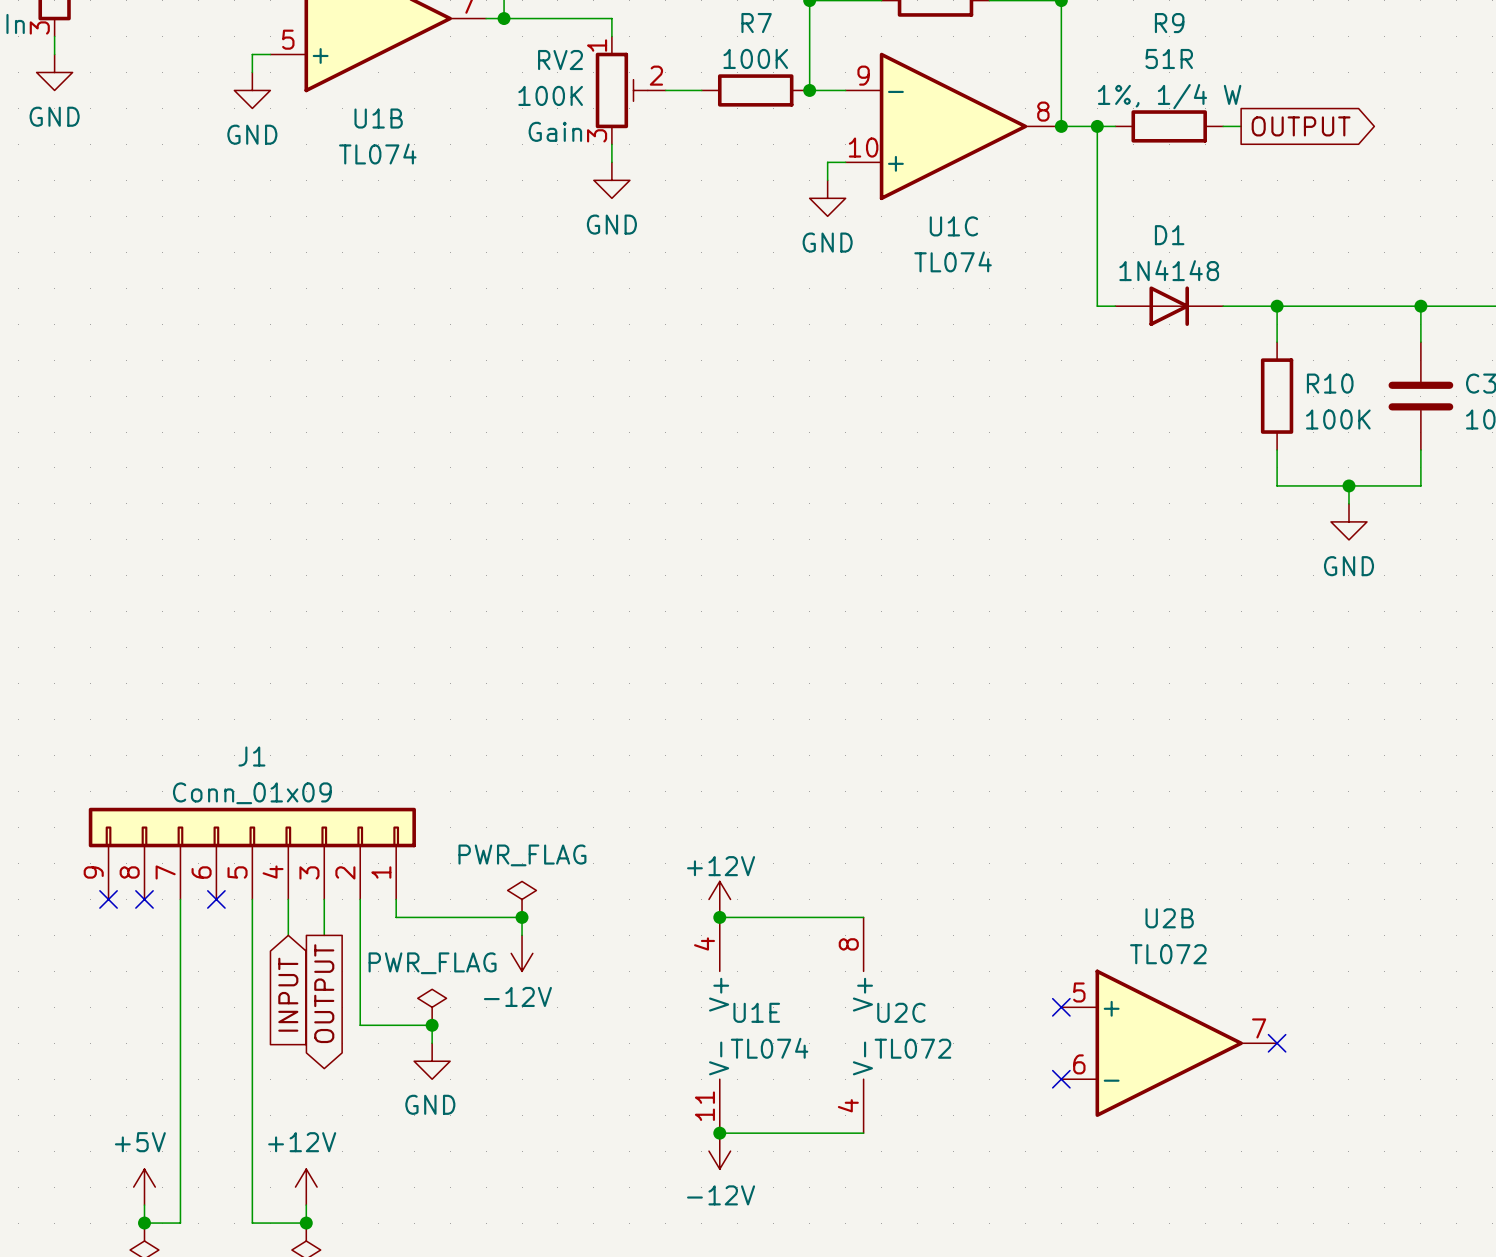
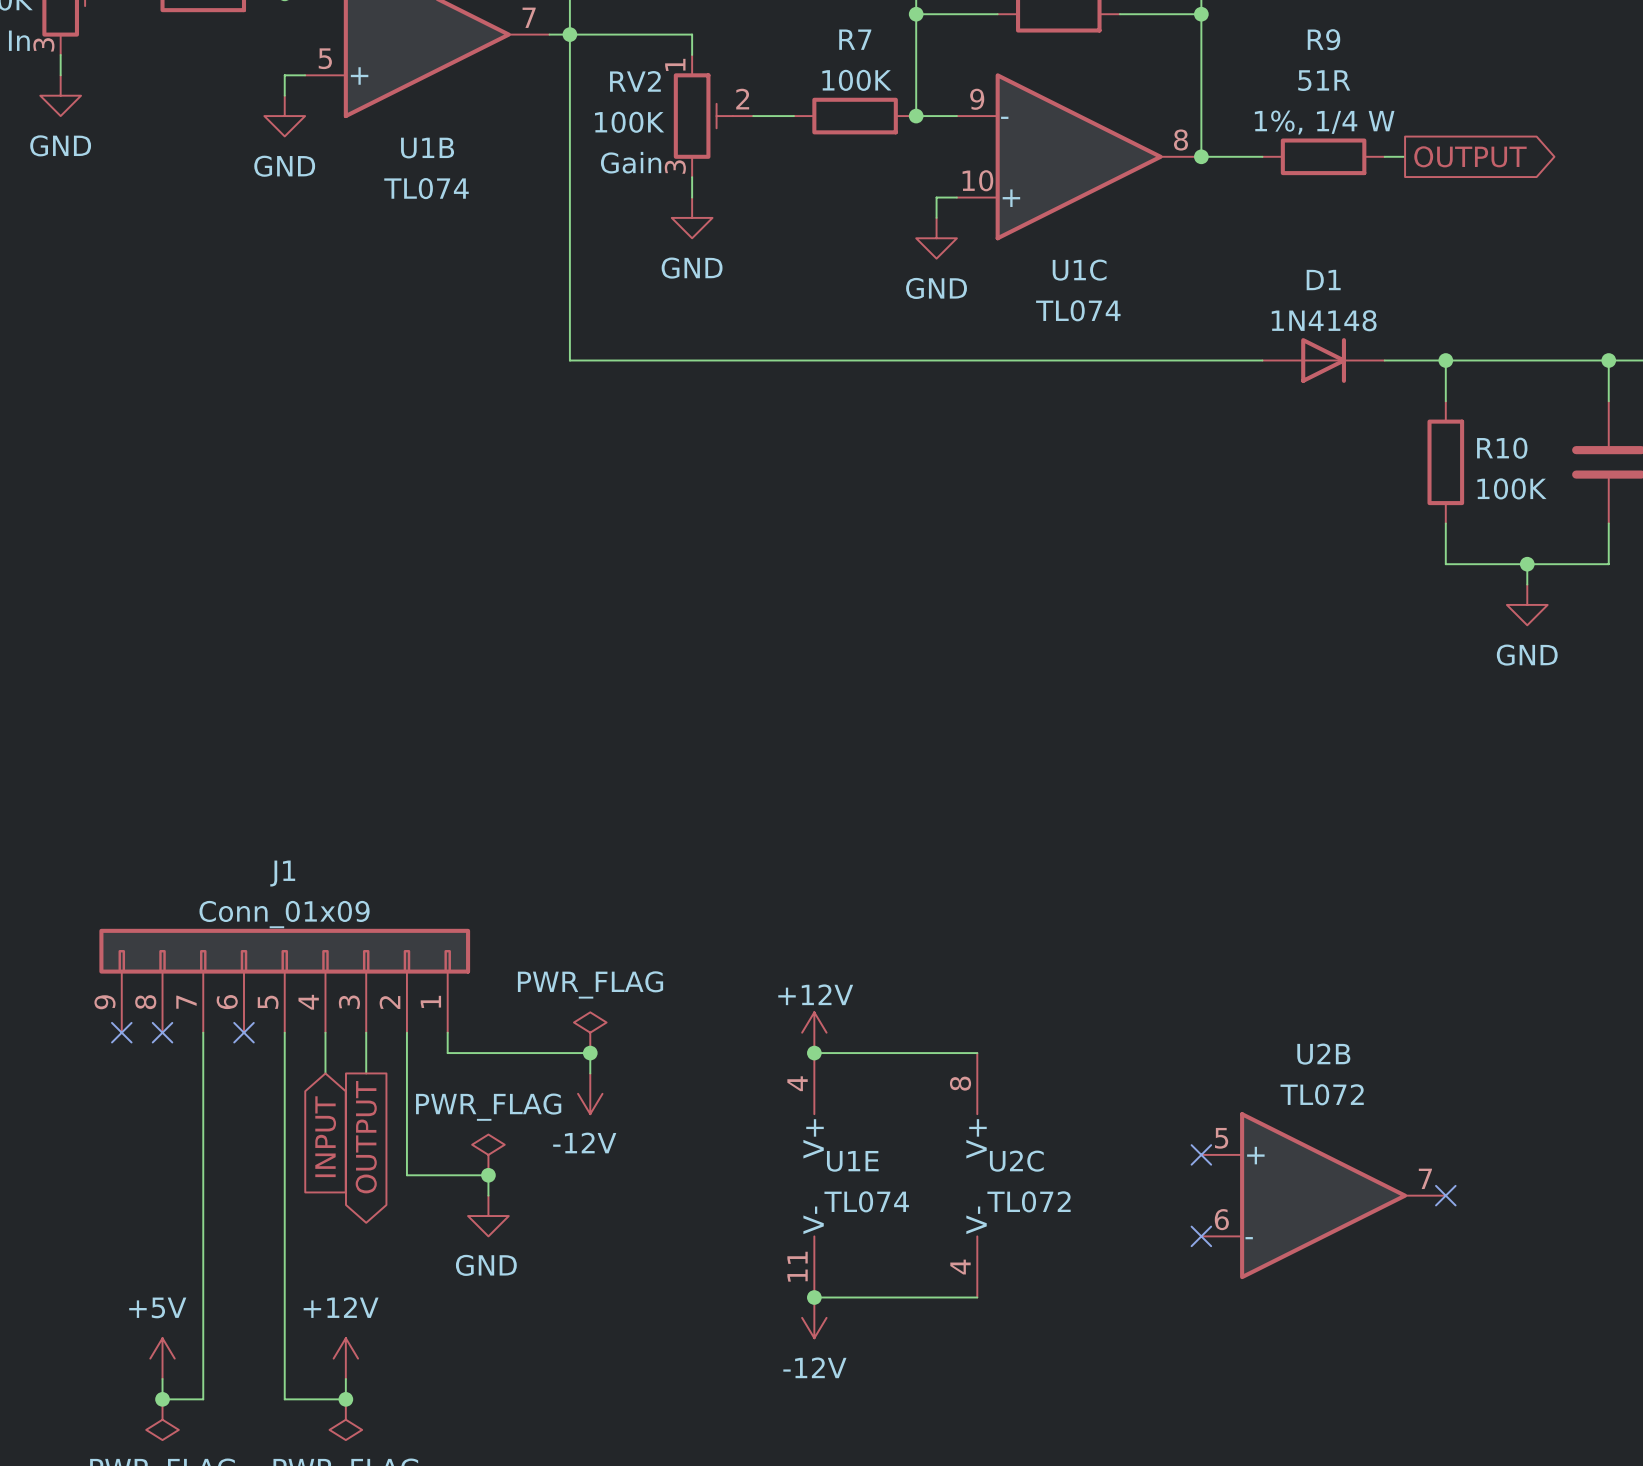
wire: (1097, 126) (1097, 306) -> (569, 34) (569, 360) (1242, 360)
junction: (1097, 126) -> none

